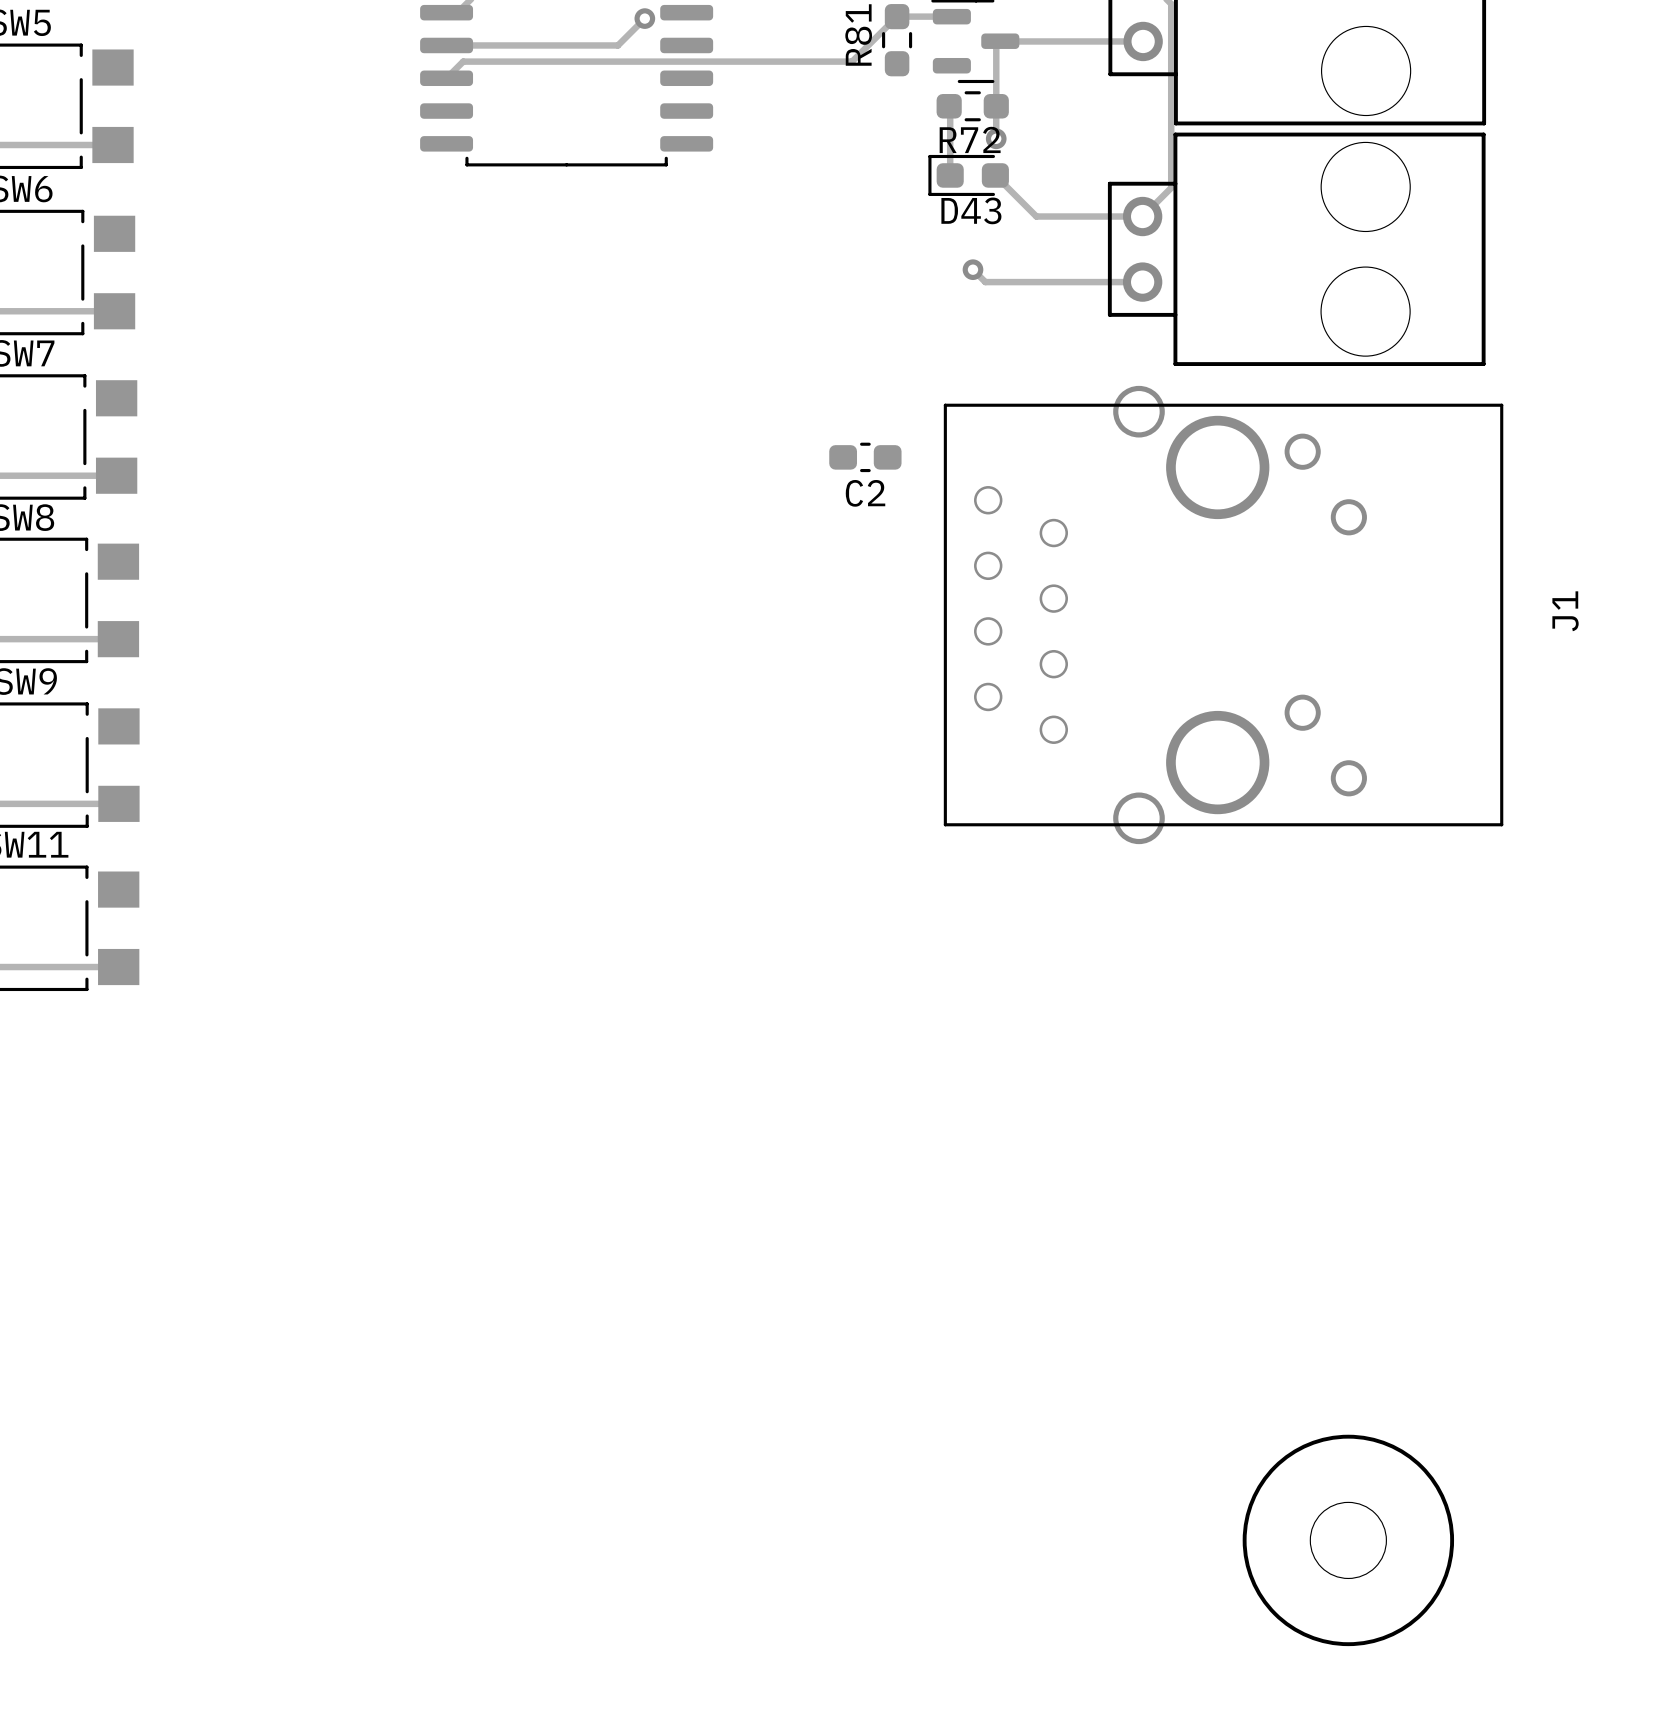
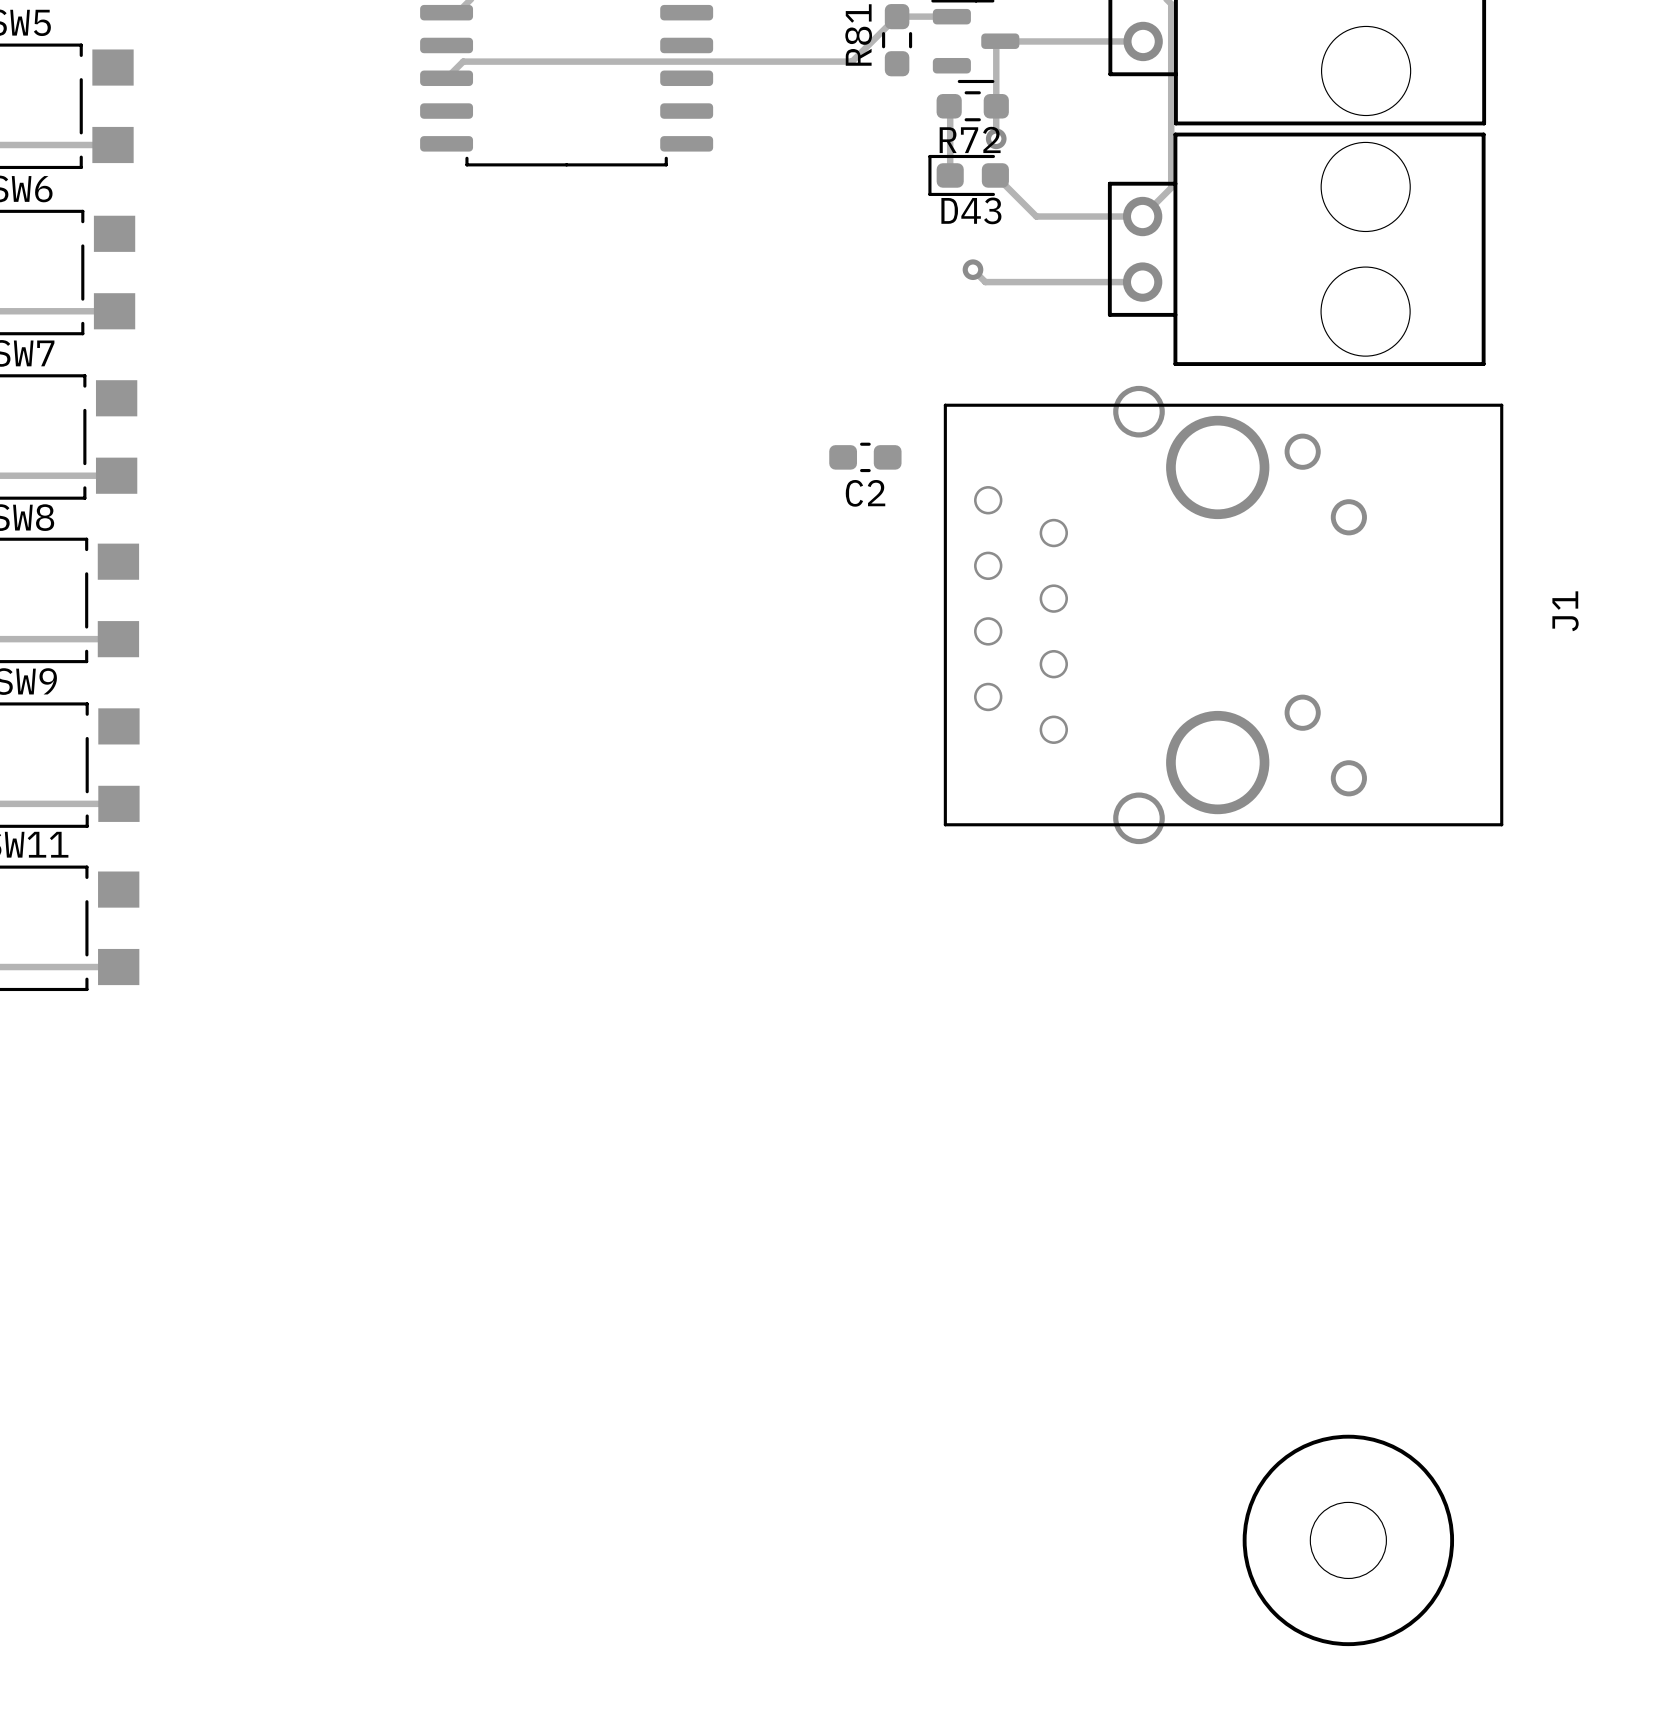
track: (644, 18) (617, 45) (446, 45) -> none
via: (644, 18) -> none

